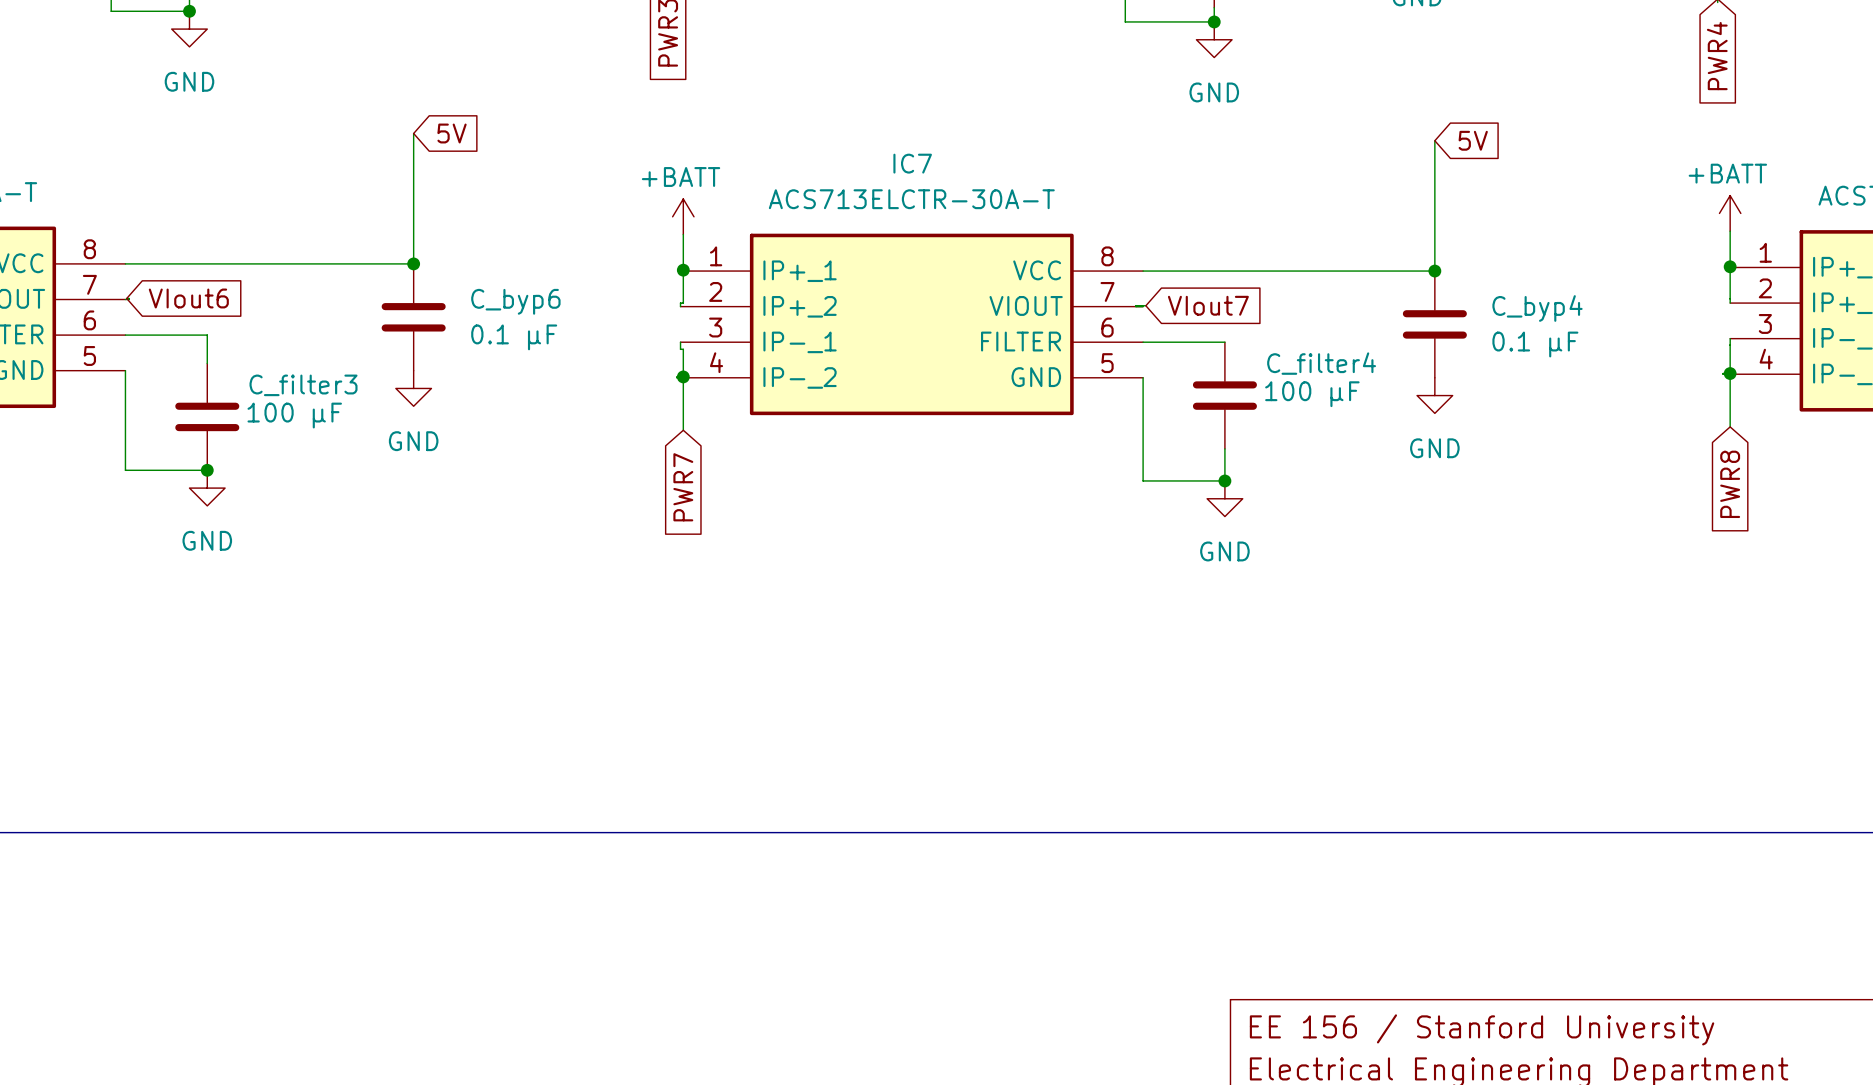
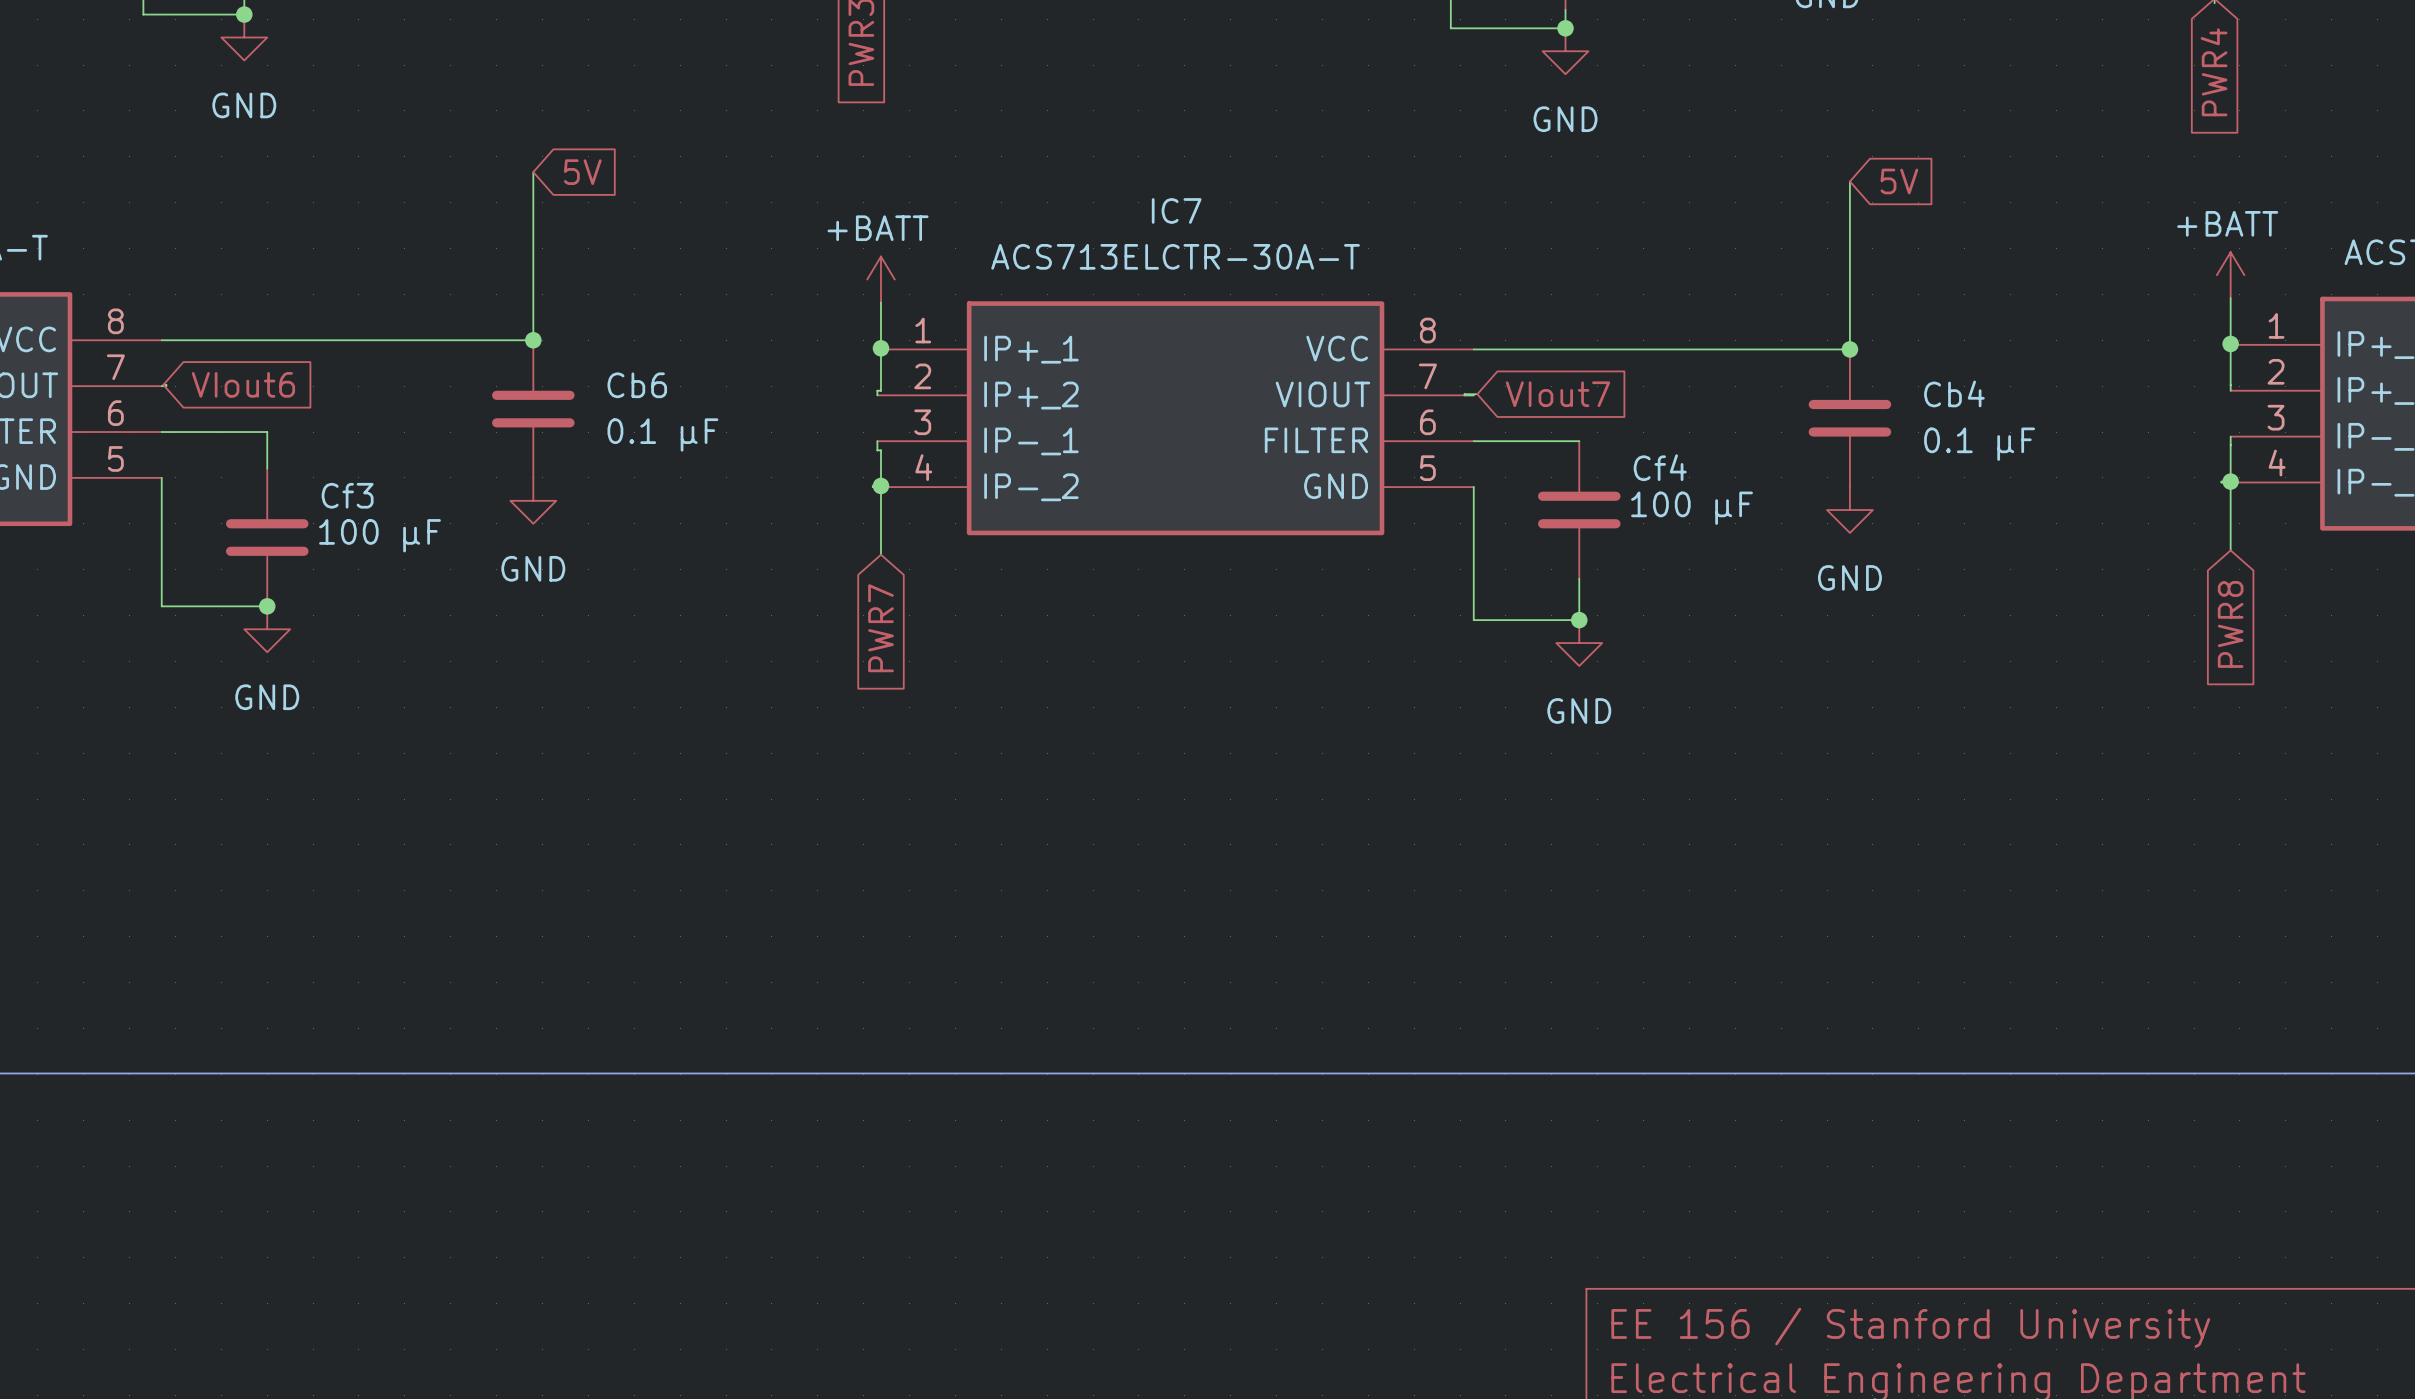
C_byp6 name: C_byp6 (515, 301) -> Cb6 (637, 385)
C_byp4 name: C_byp4 (1537, 308) -> Cb4 (1954, 393)
C_filter4 name: C_filter4 (1321, 363) -> Cf4 (1660, 467)
C_filter3 name: C_filter3 (303, 385) -> Cf3 (347, 495)

